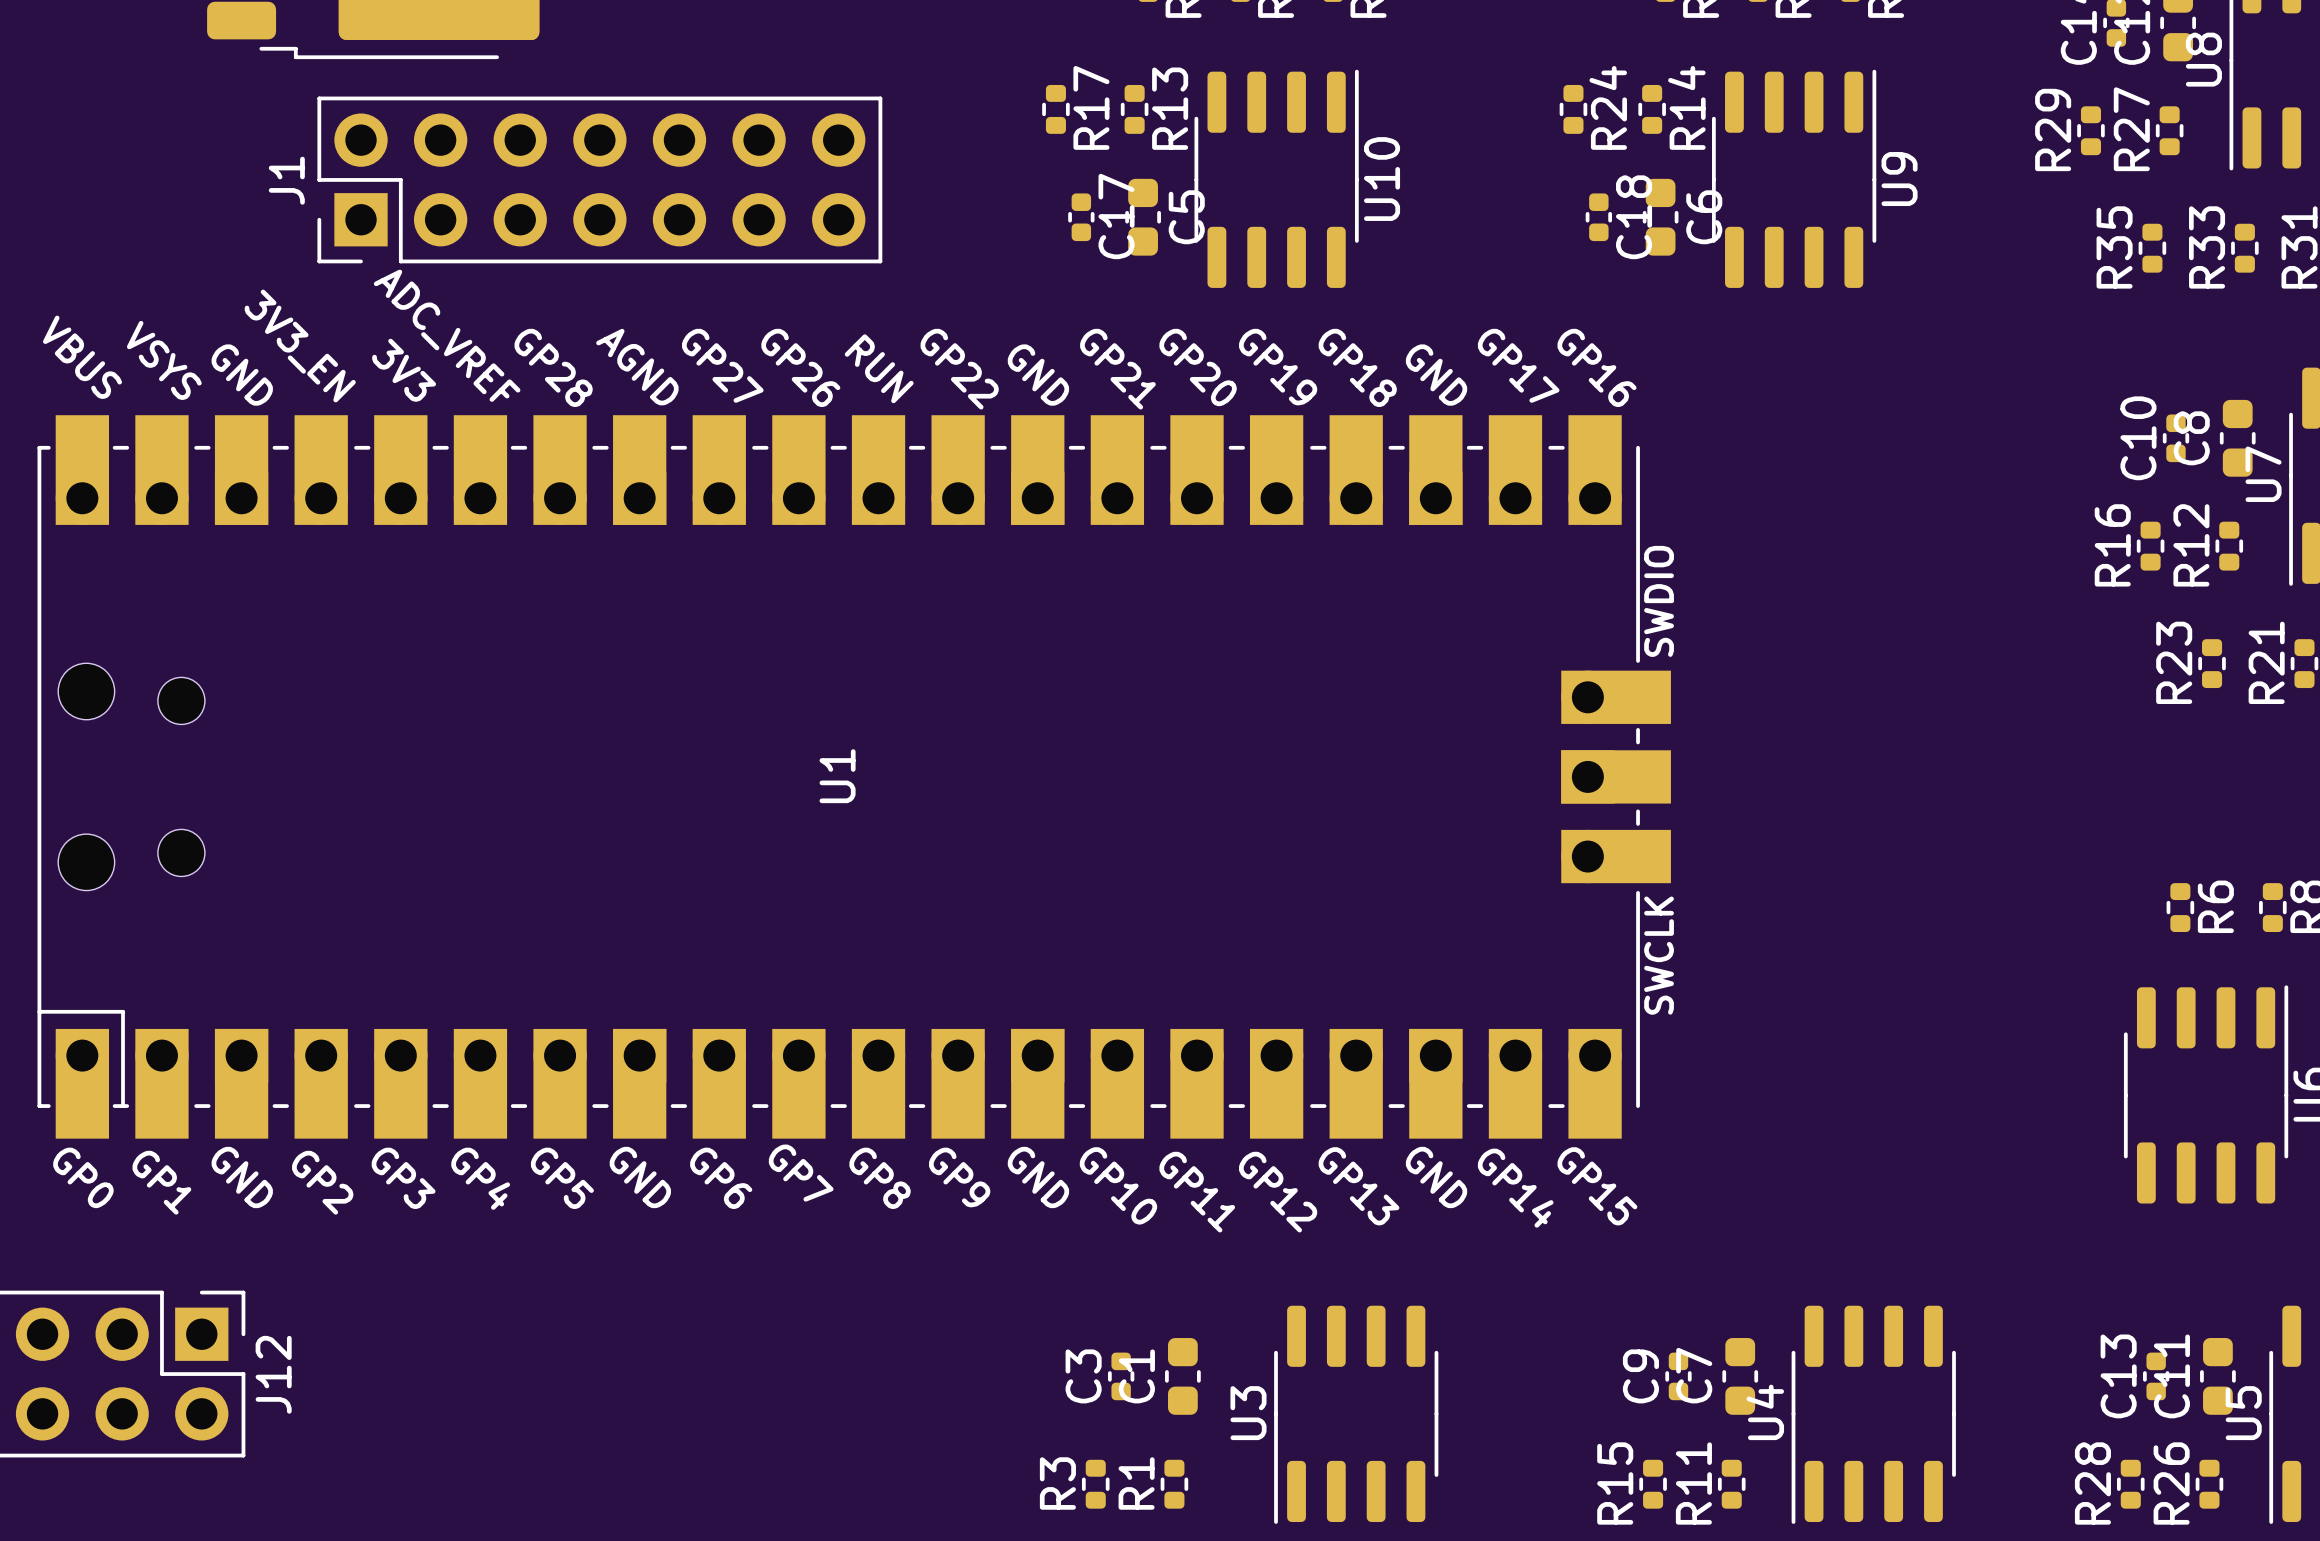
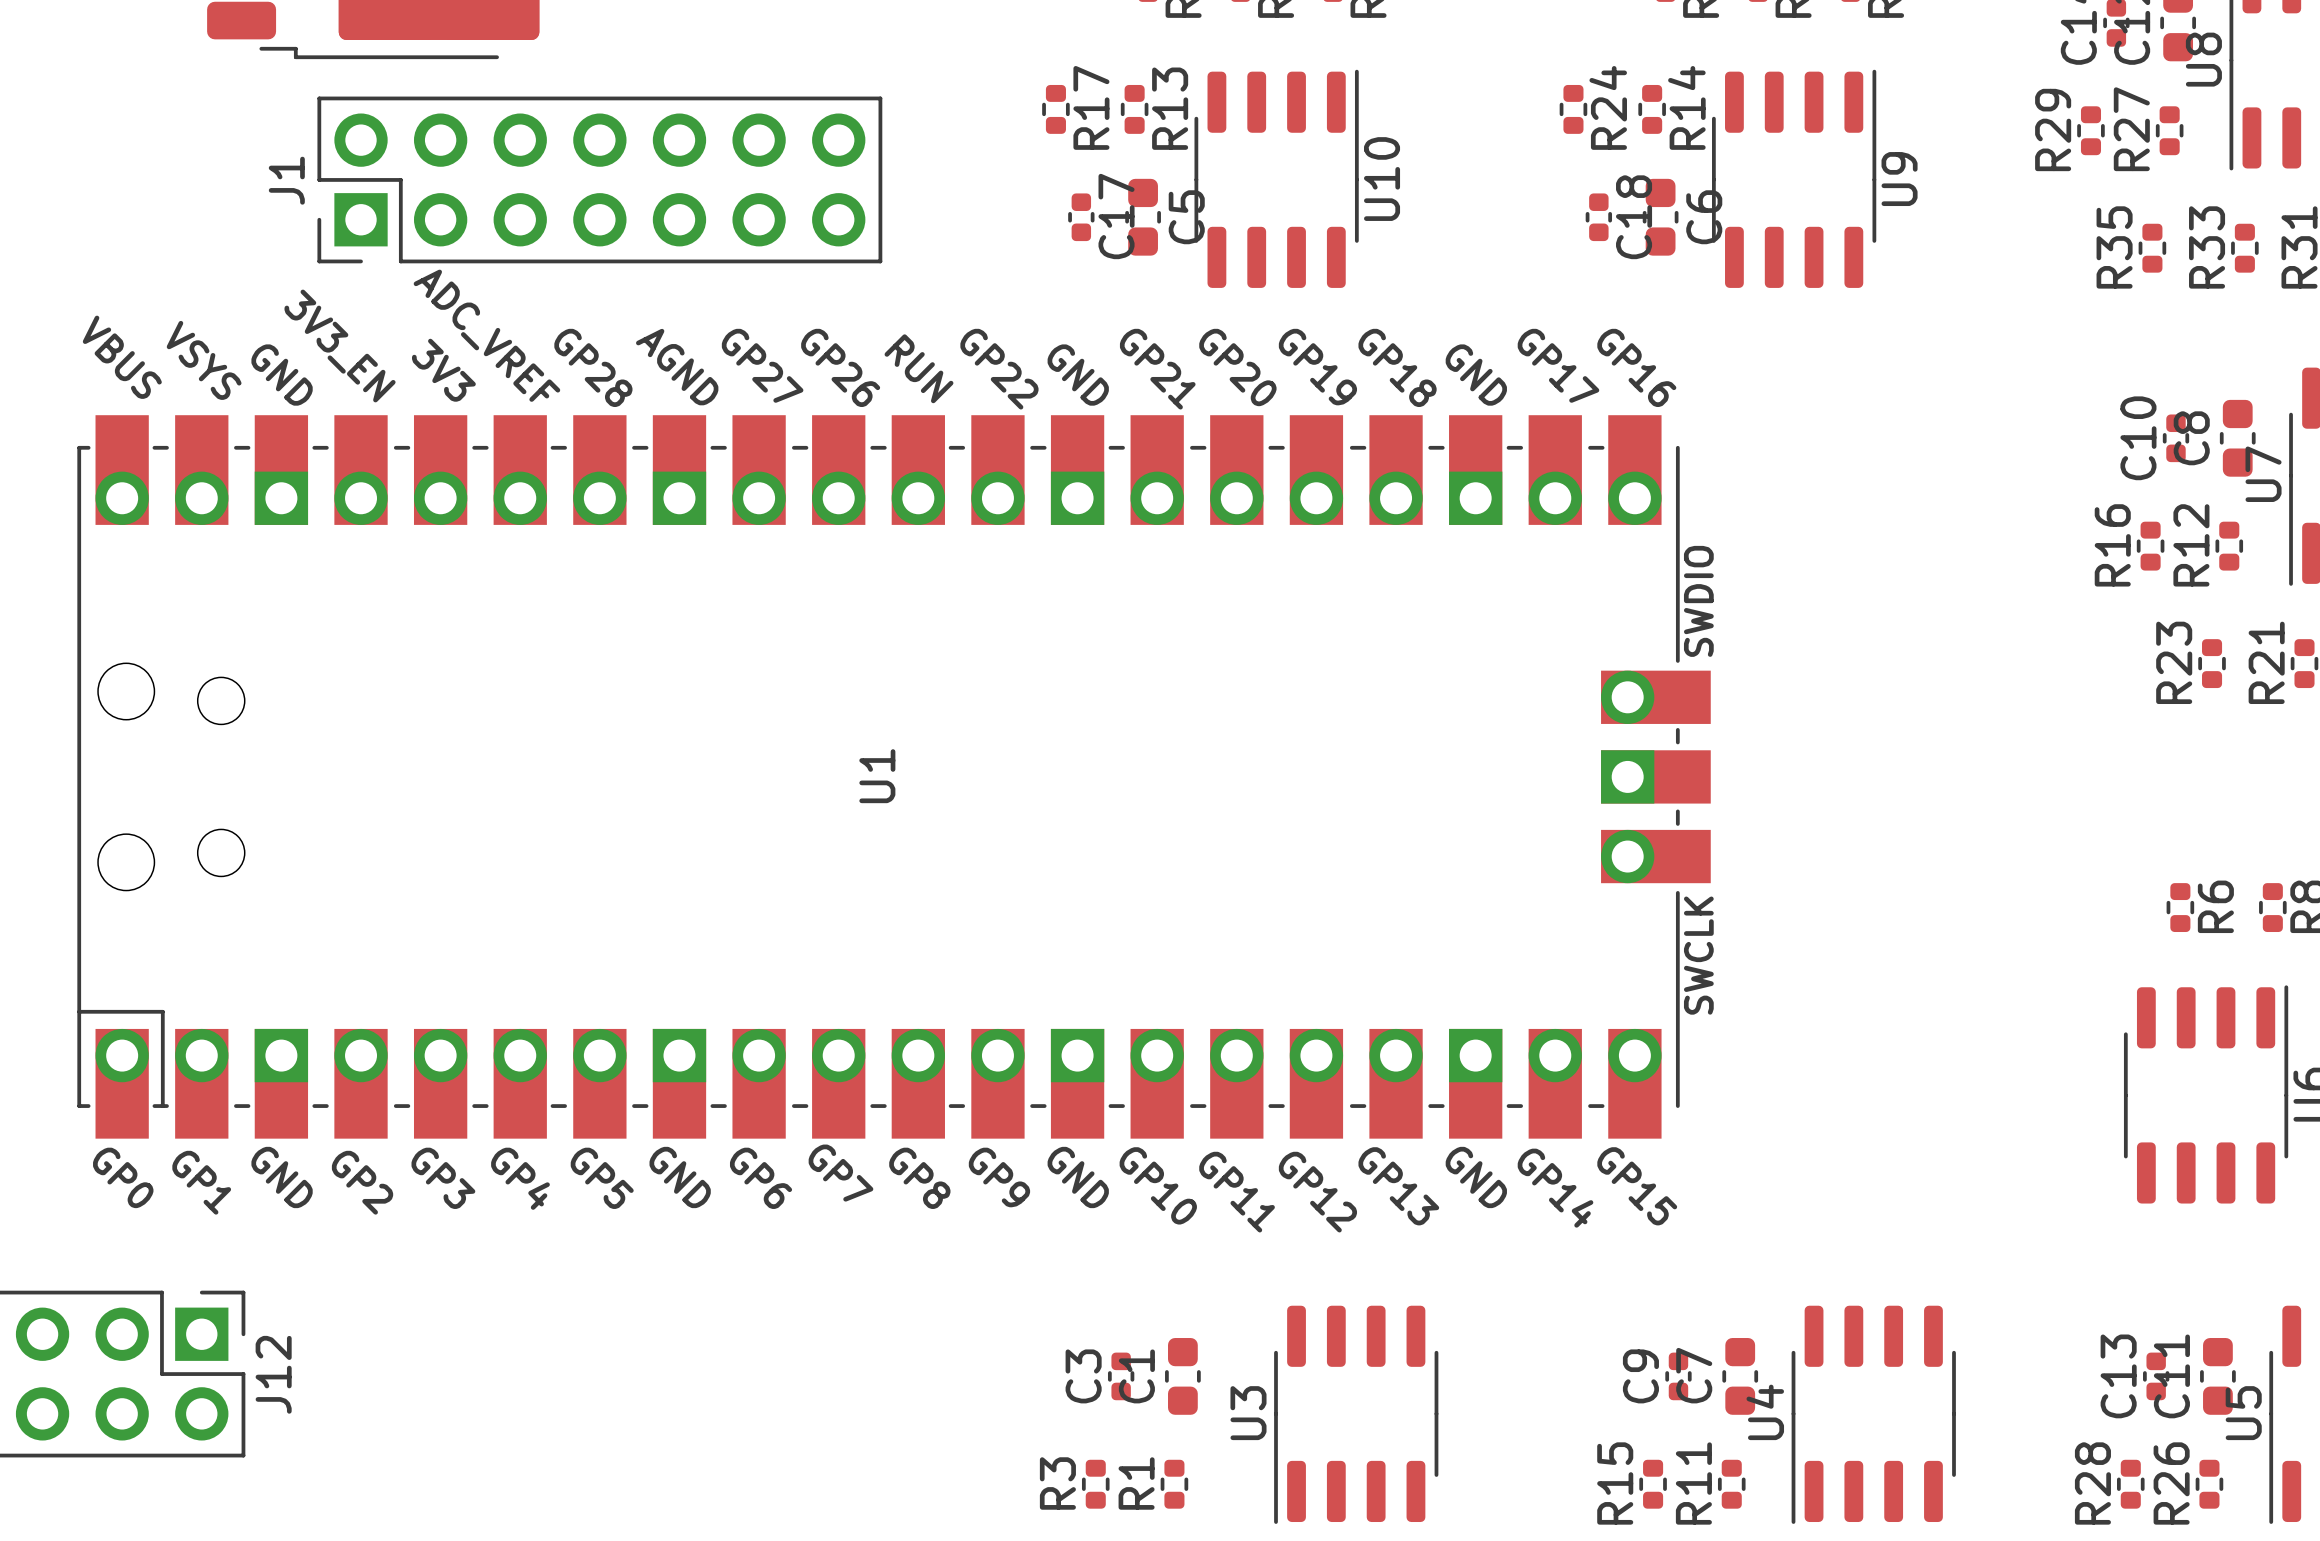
U1 position: (854, 776) -> (894, 776)

